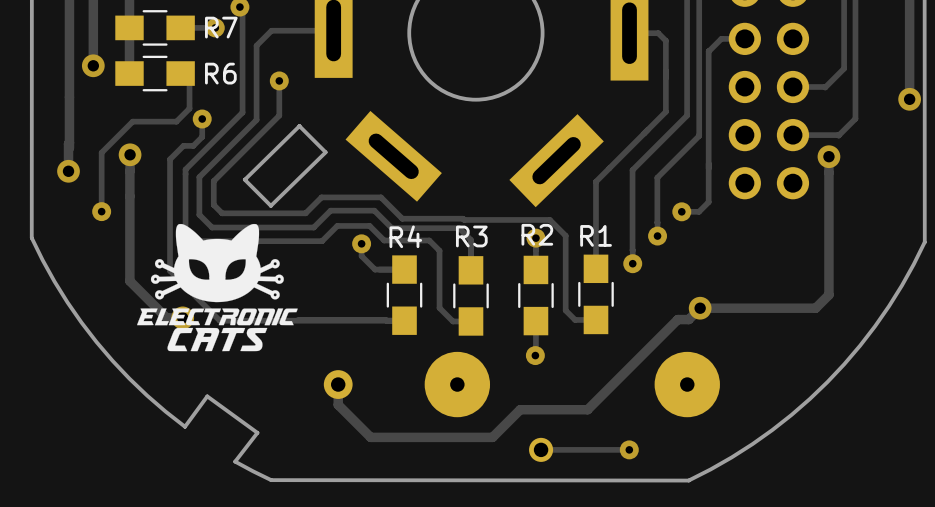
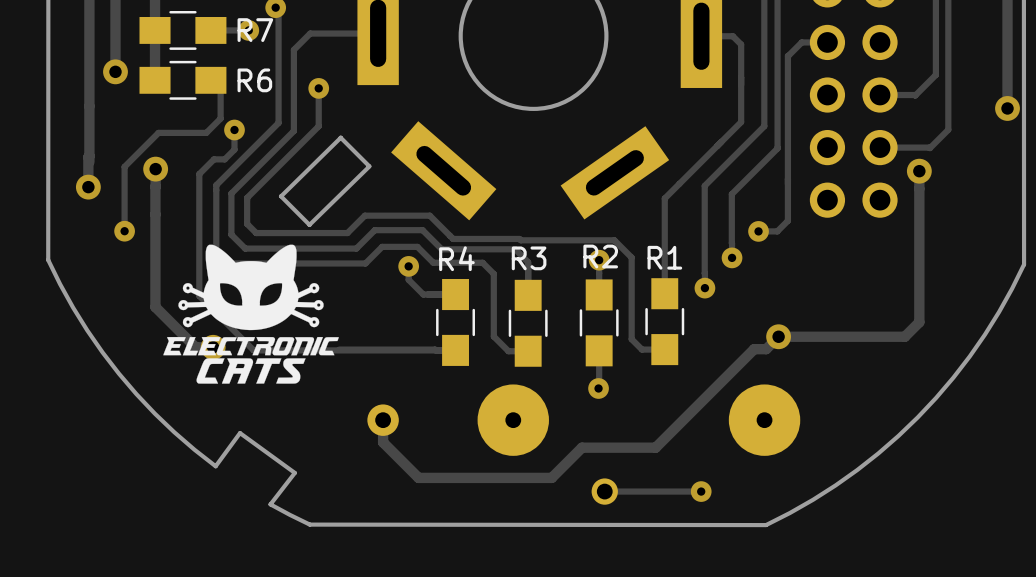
part rotation: 0° (556, 160) -> 9° clockwise (614, 172)

